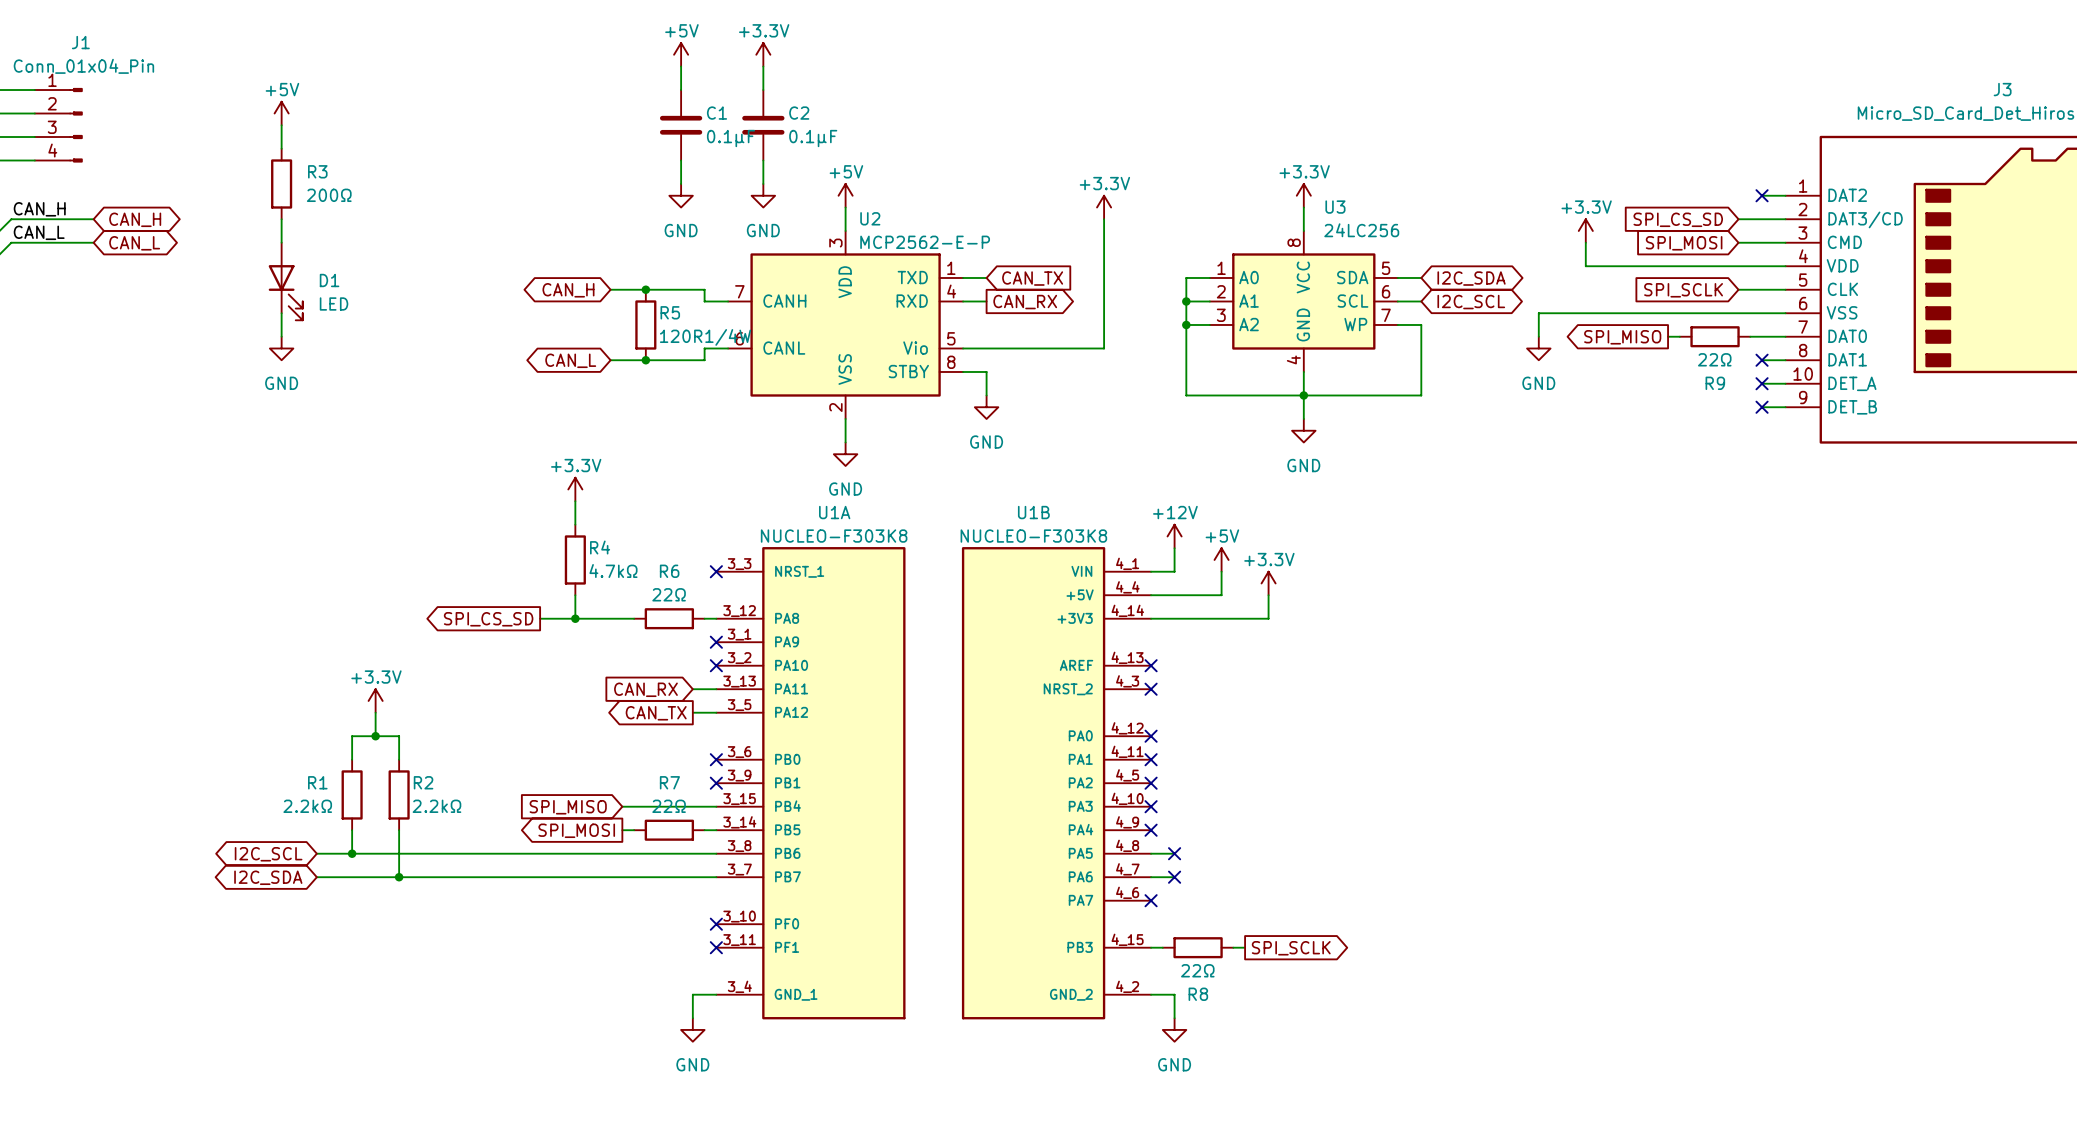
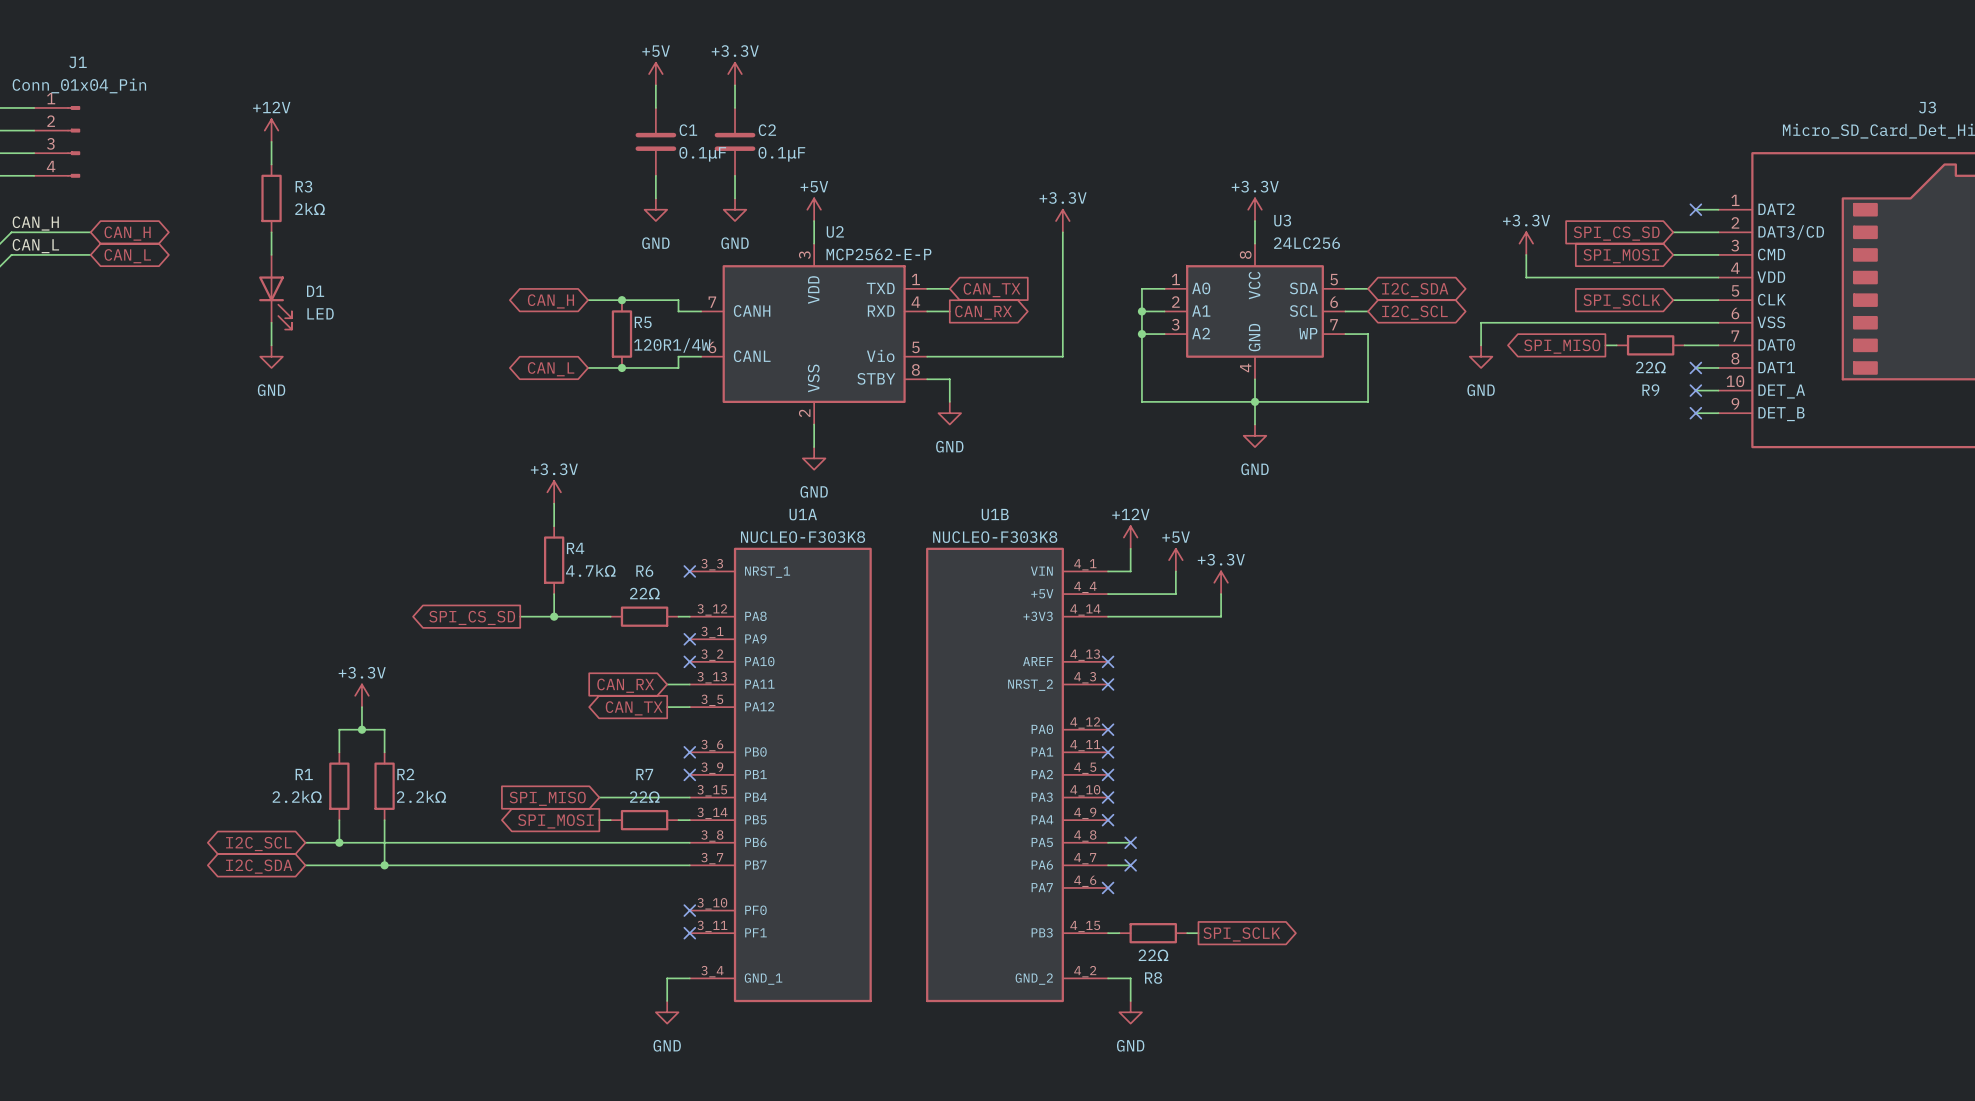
power symbol: +5V (281, 113) -> +12V (271, 130)
R3 value: 200Ω (329, 195) -> 2kΩ (310, 208)

